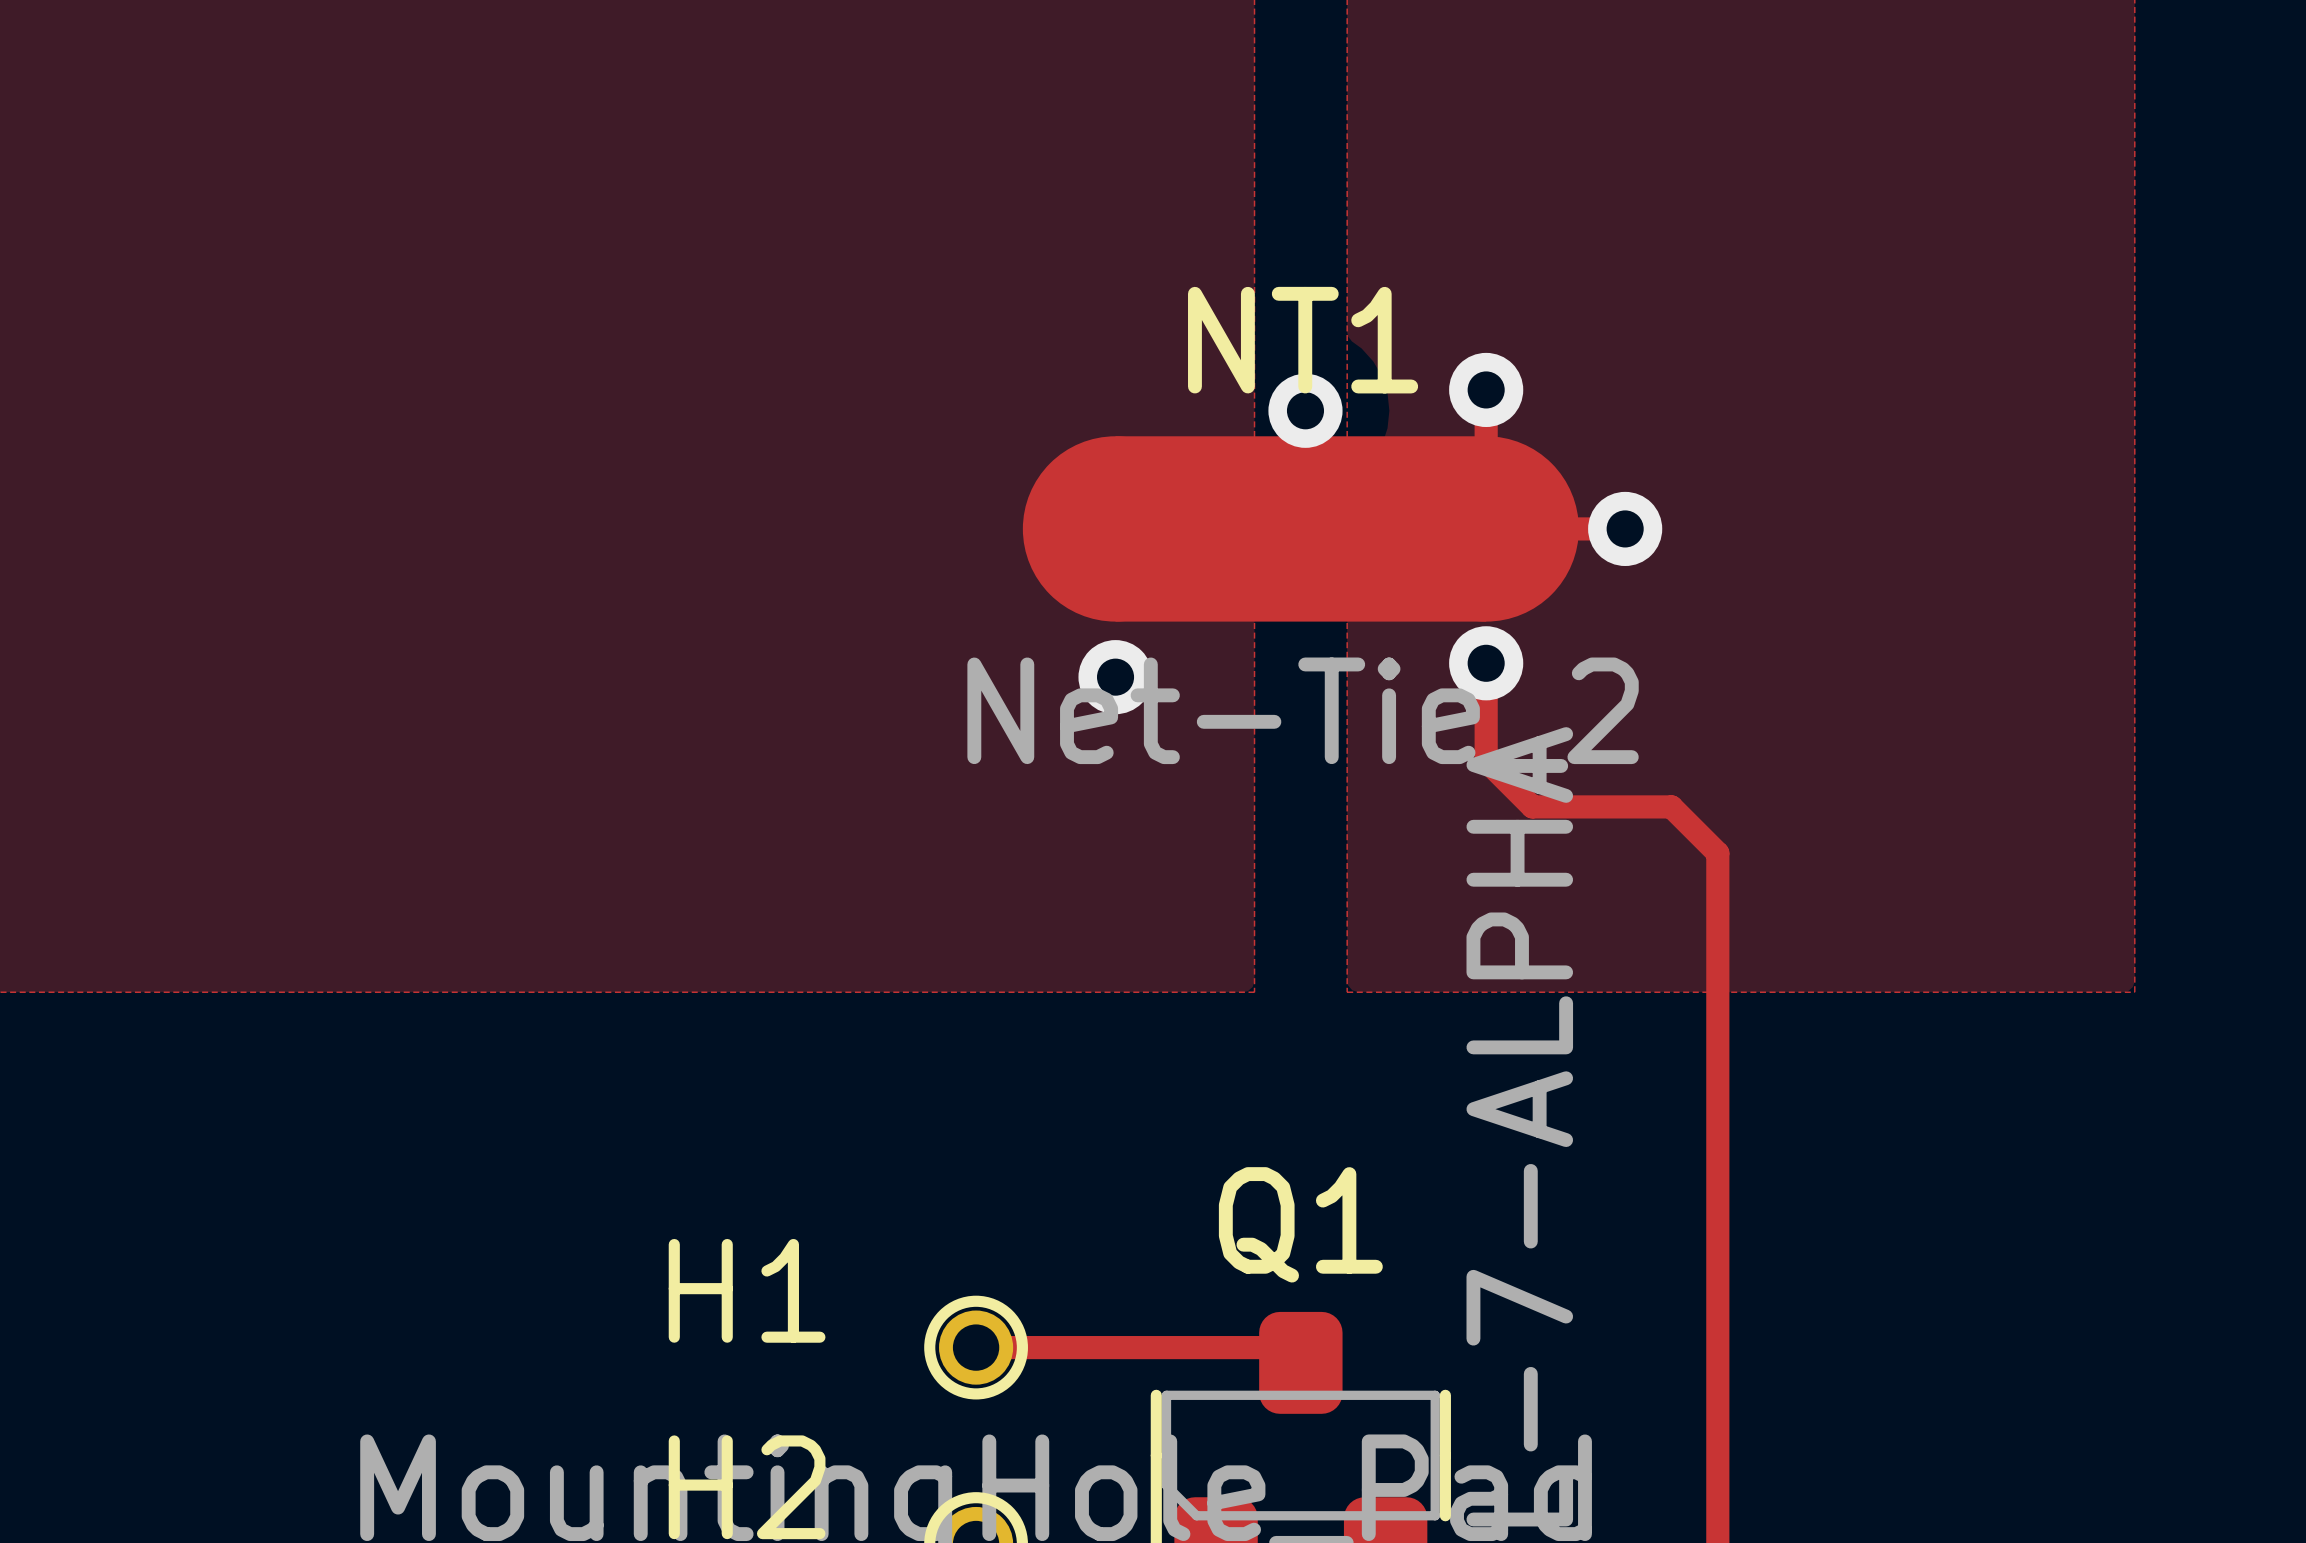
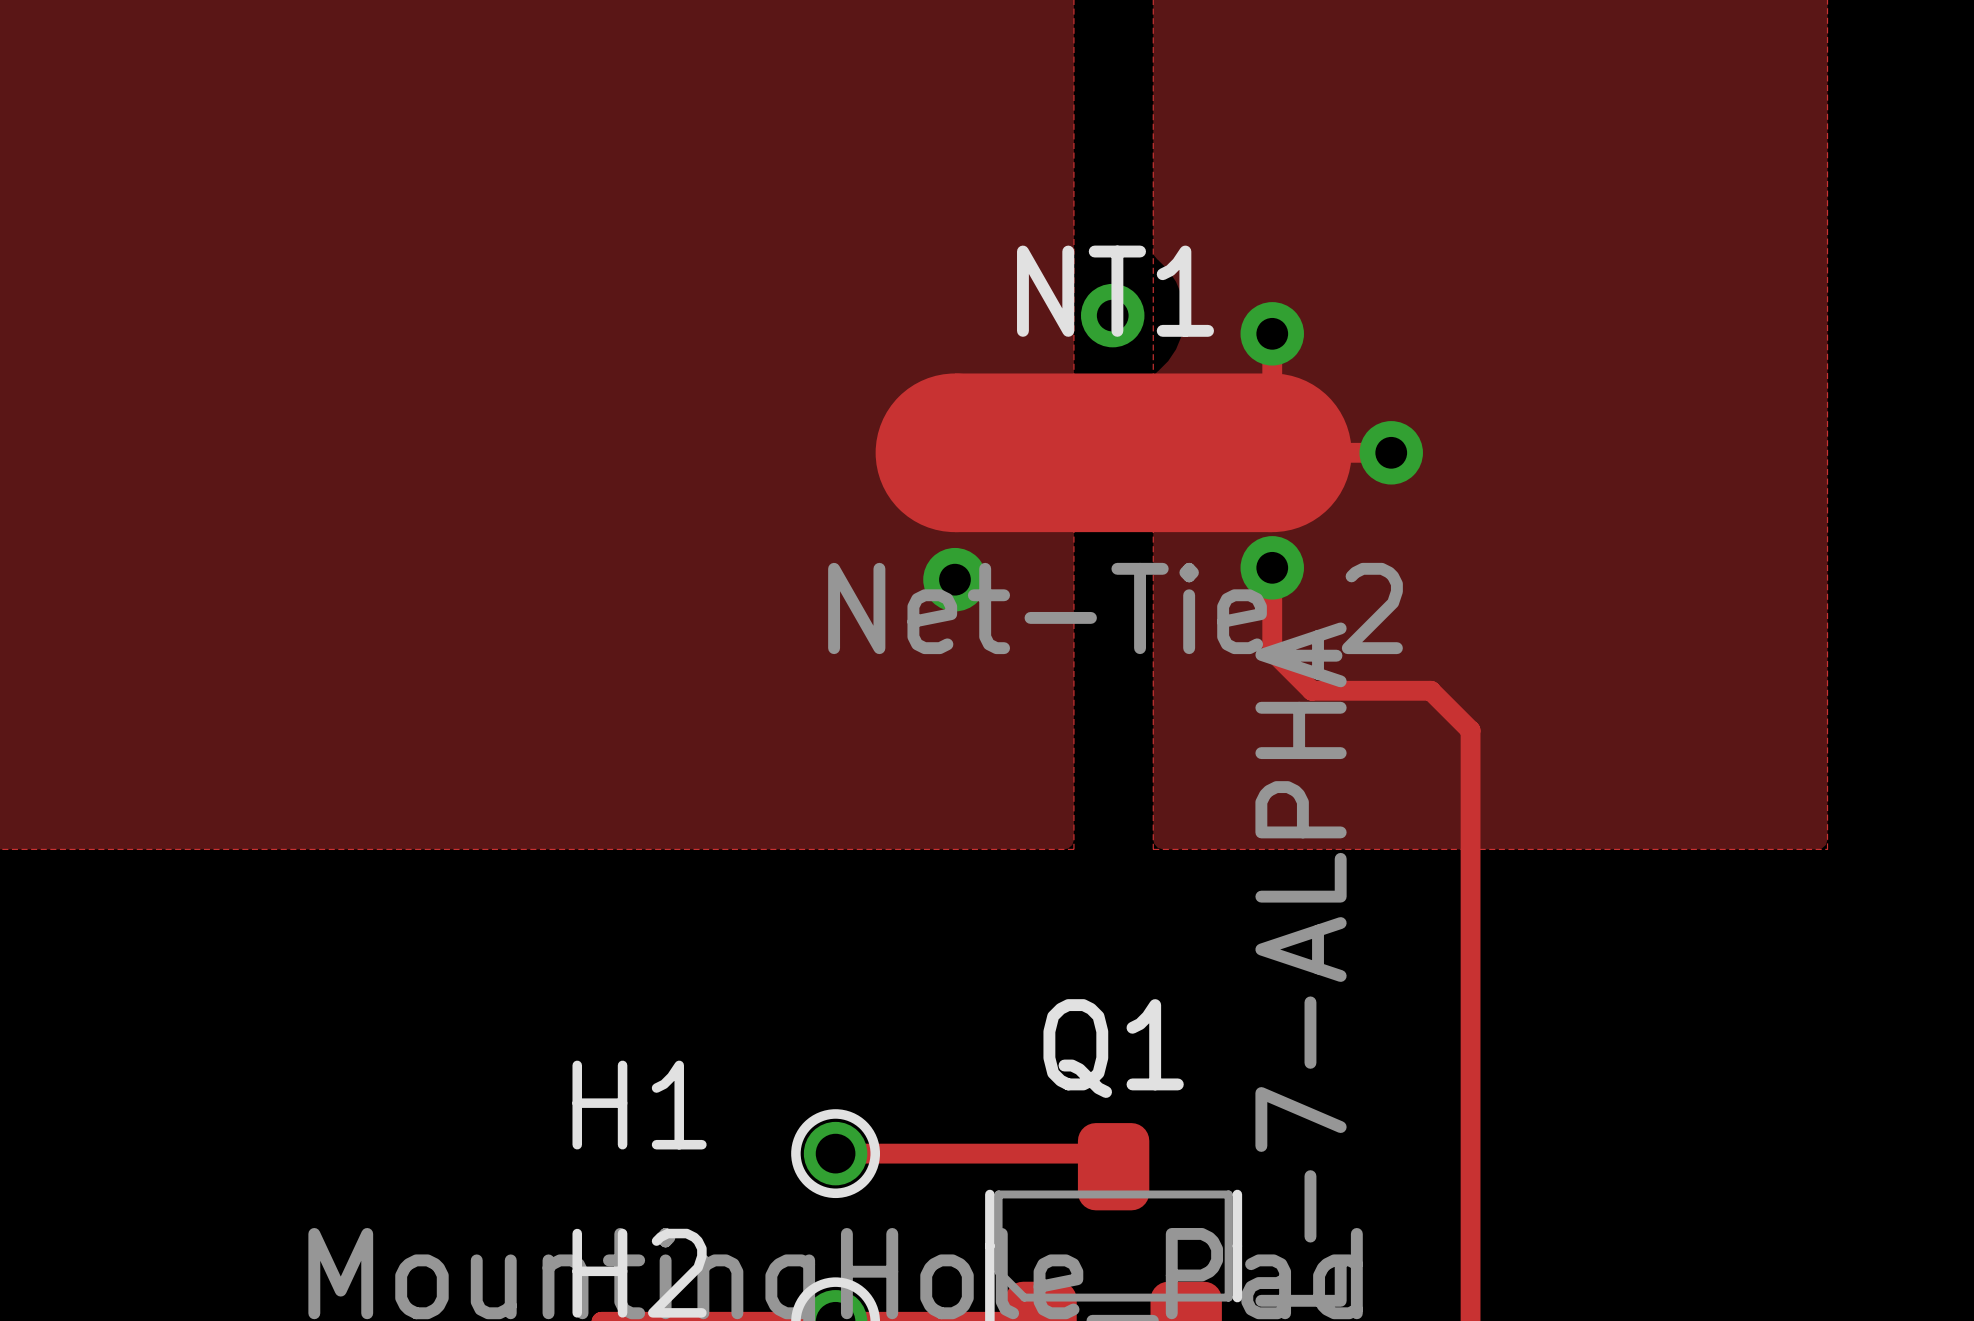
via position: (1305, 410) -> (1112, 315)

